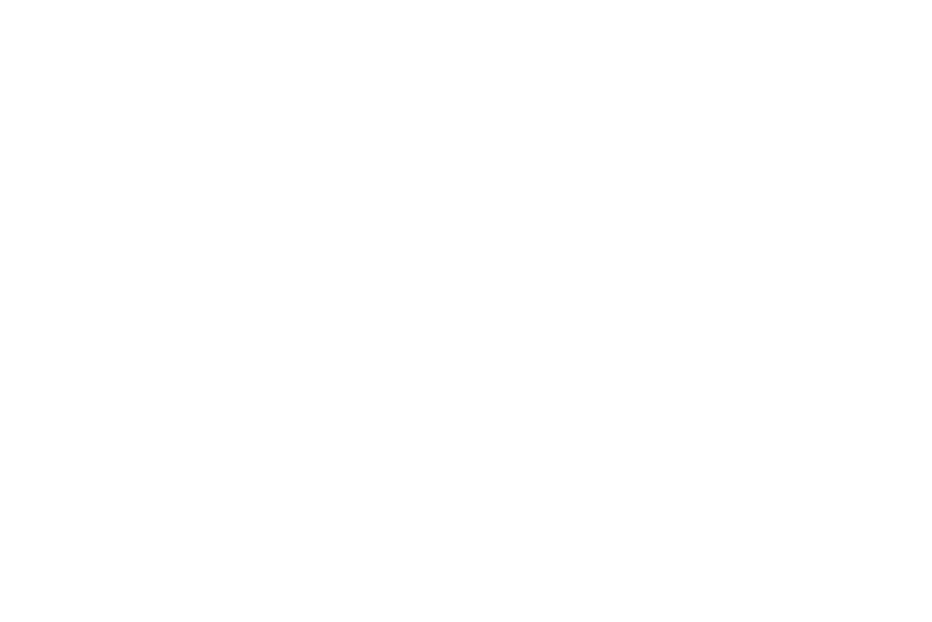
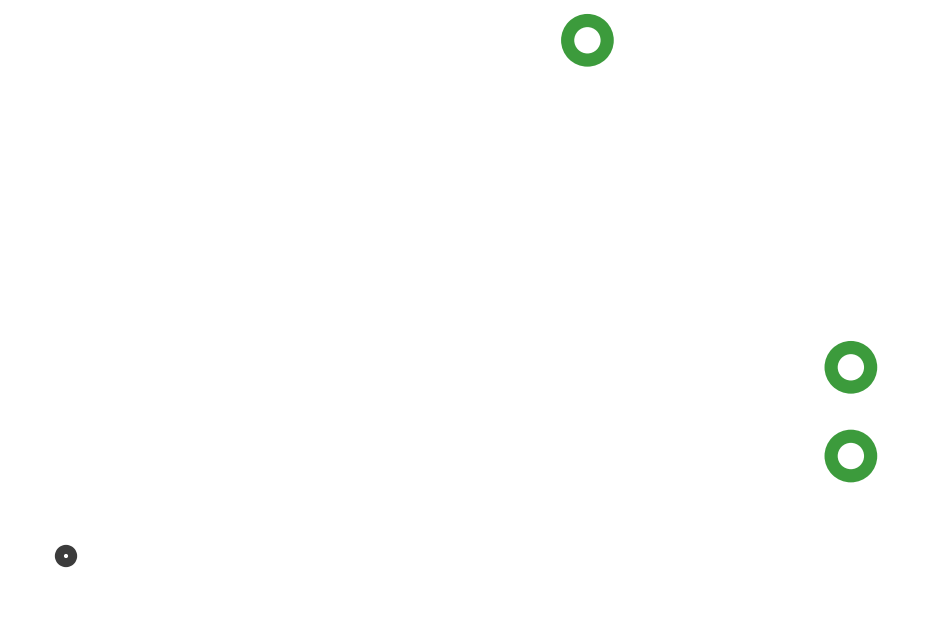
part: none -> (587, 40)
part: none -> (850, 367)
part: none -> (850, 456)
part: none -> (66, 556)

